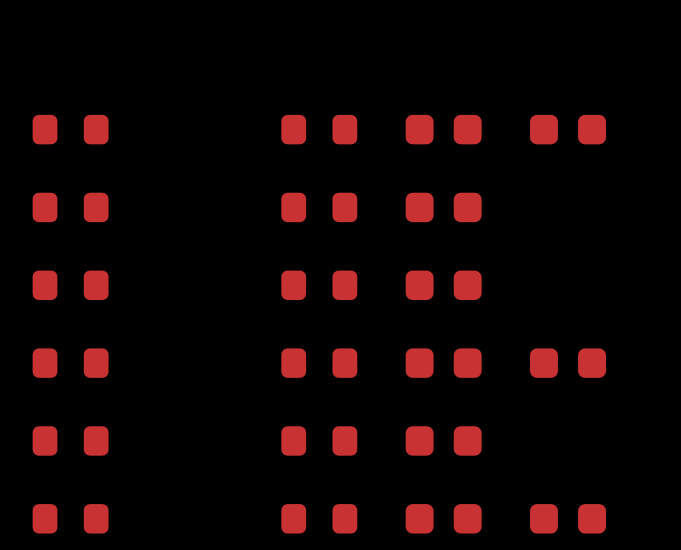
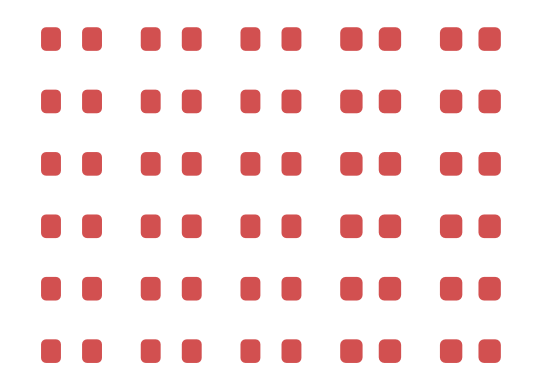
part: none -> (171, 39)
part: none -> (171, 101)
part: none -> (470, 101)
part: none -> (171, 163)
part: none -> (470, 163)
part: none -> (171, 226)
part: none -> (171, 288)
part: none -> (470, 288)
part: none -> (171, 351)

